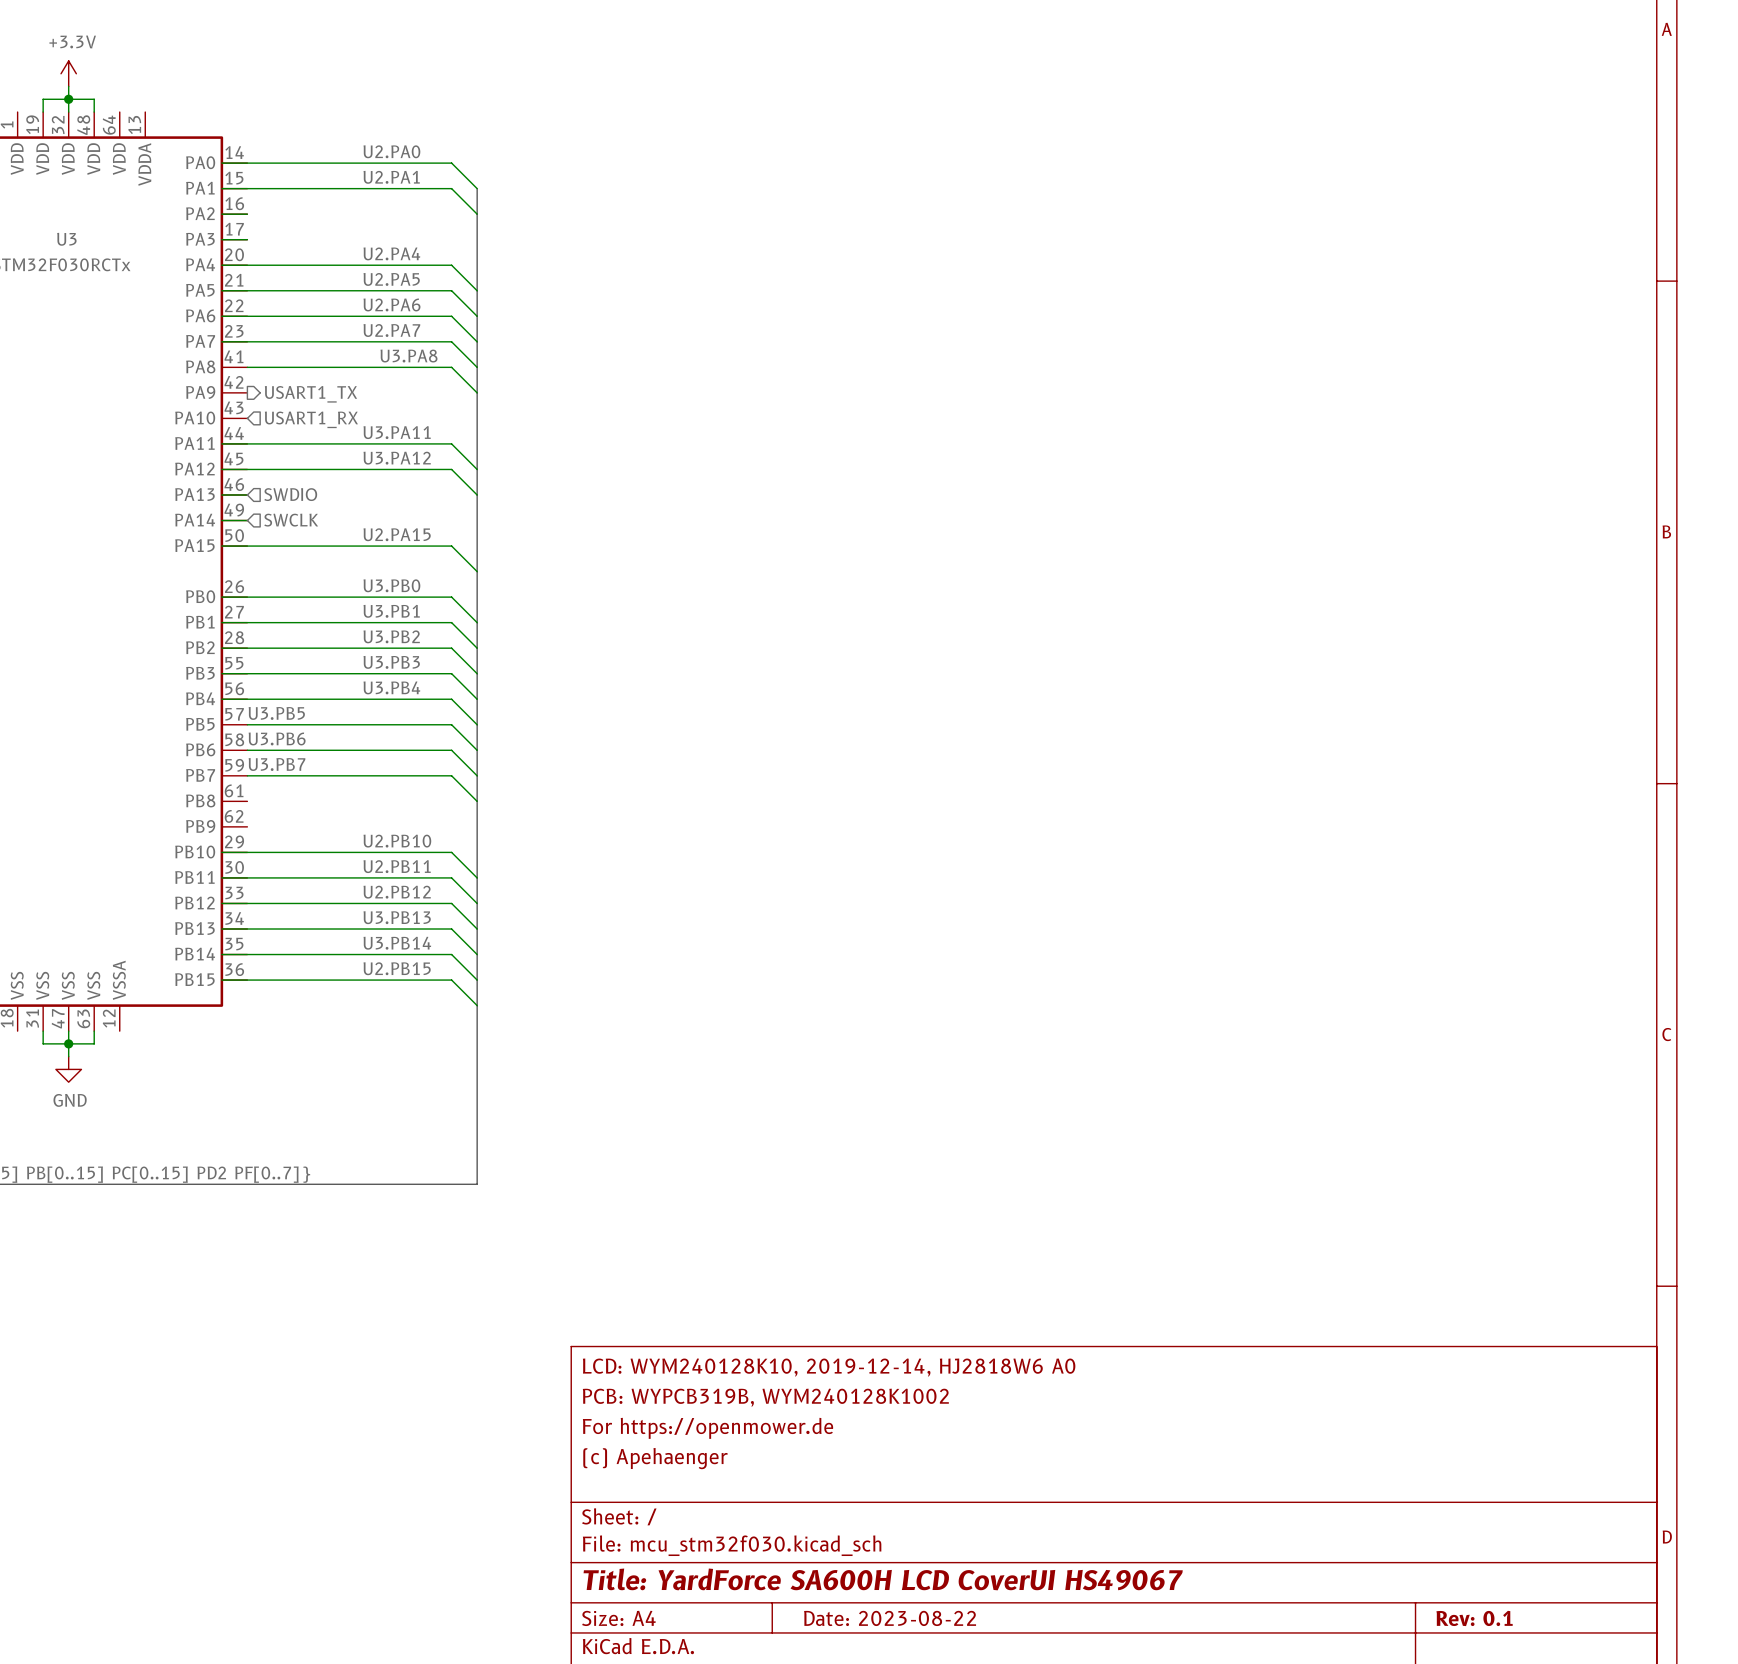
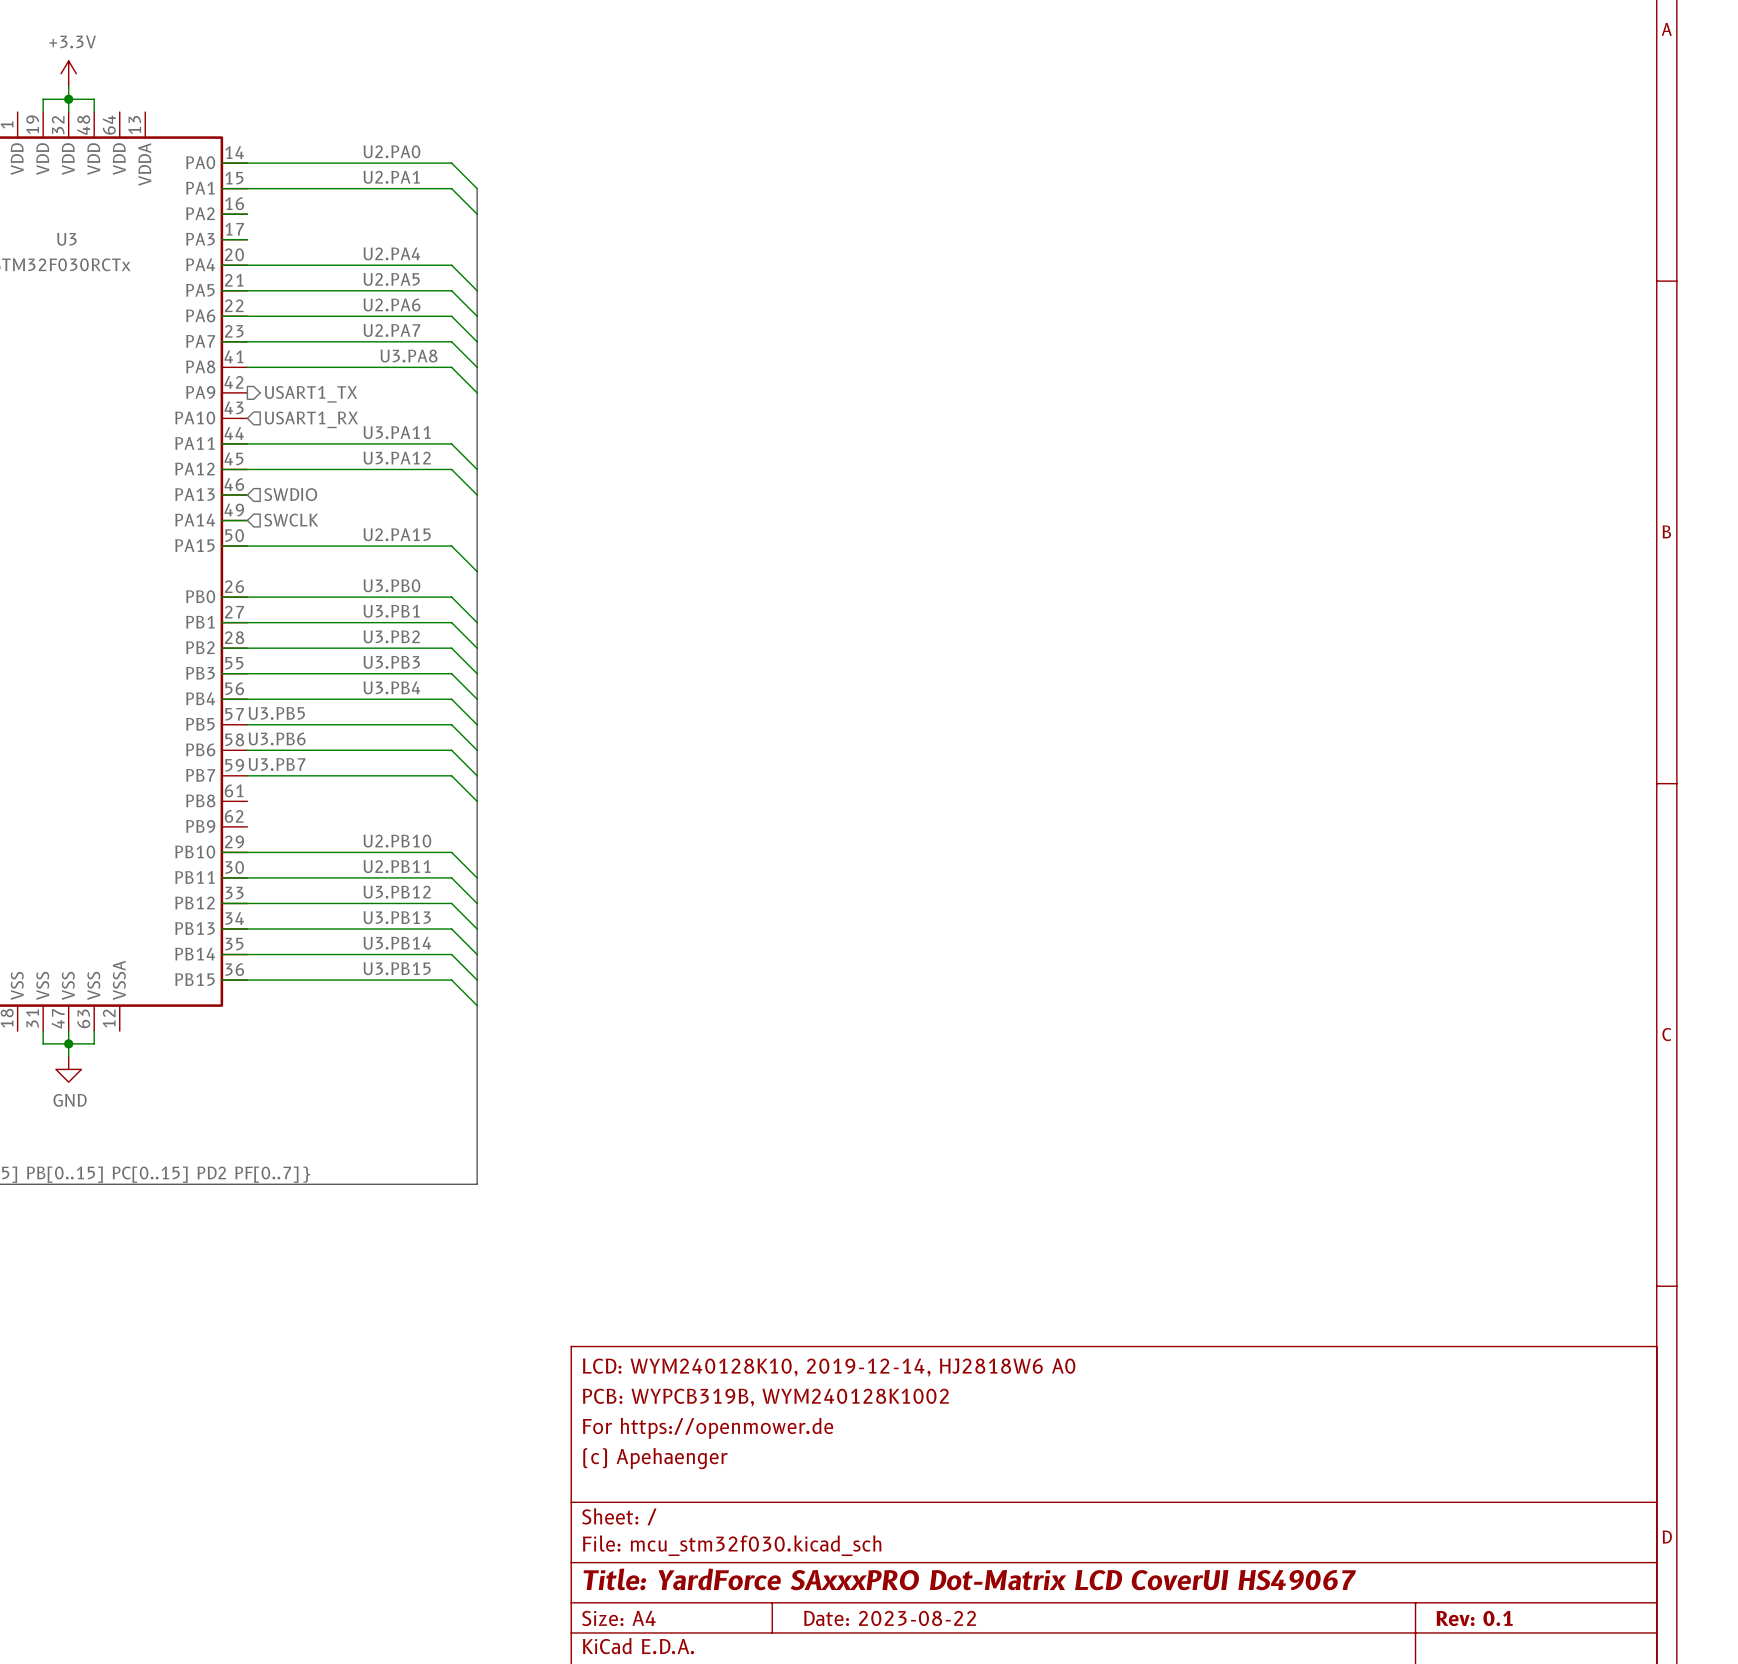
label: U2.PB12 (397, 892) -> U3.PB12 (397, 892)
label: U2.PB15 (397, 968) -> U3.PB15 (397, 968)
title block: Title: YardForce SA600H LCD CoverUI HS49067 (883, 1579) -> Title: YardForce SAxxxPRO Dot-Matrix LCD CoverUI HS49067 (969, 1579)

